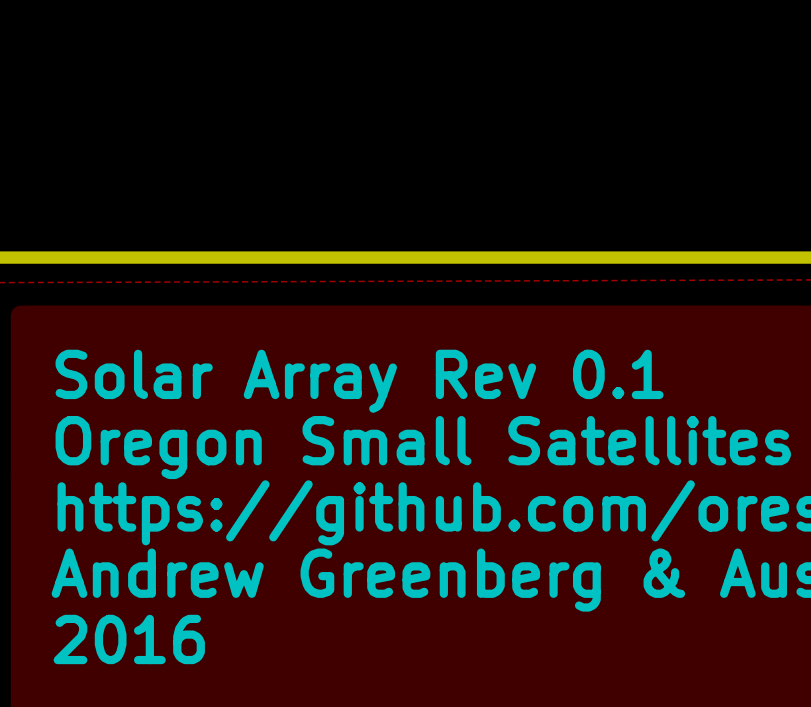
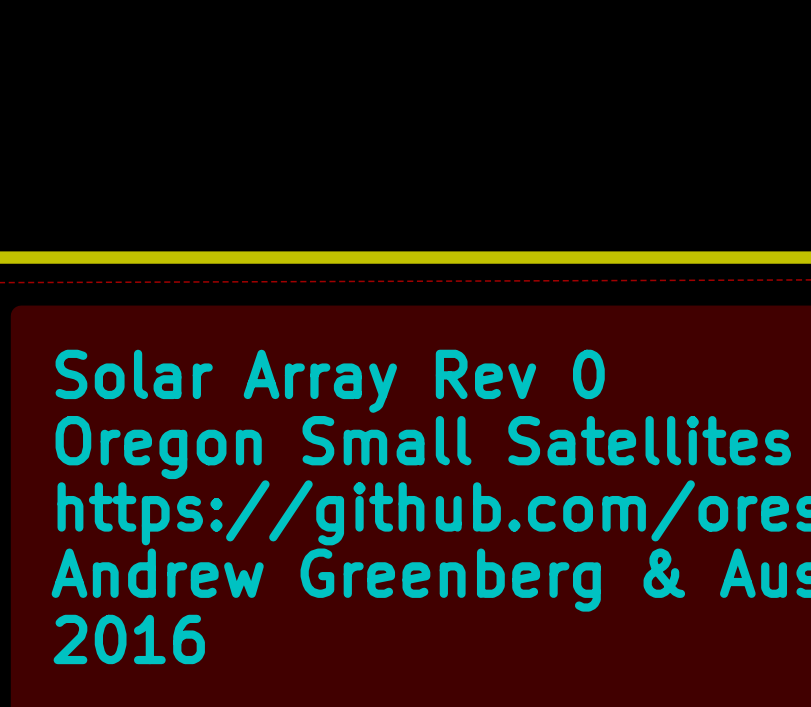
text: Solar Array Rev 0.1 (359, 381) -> Solar Array Rev 0 (330, 381)

